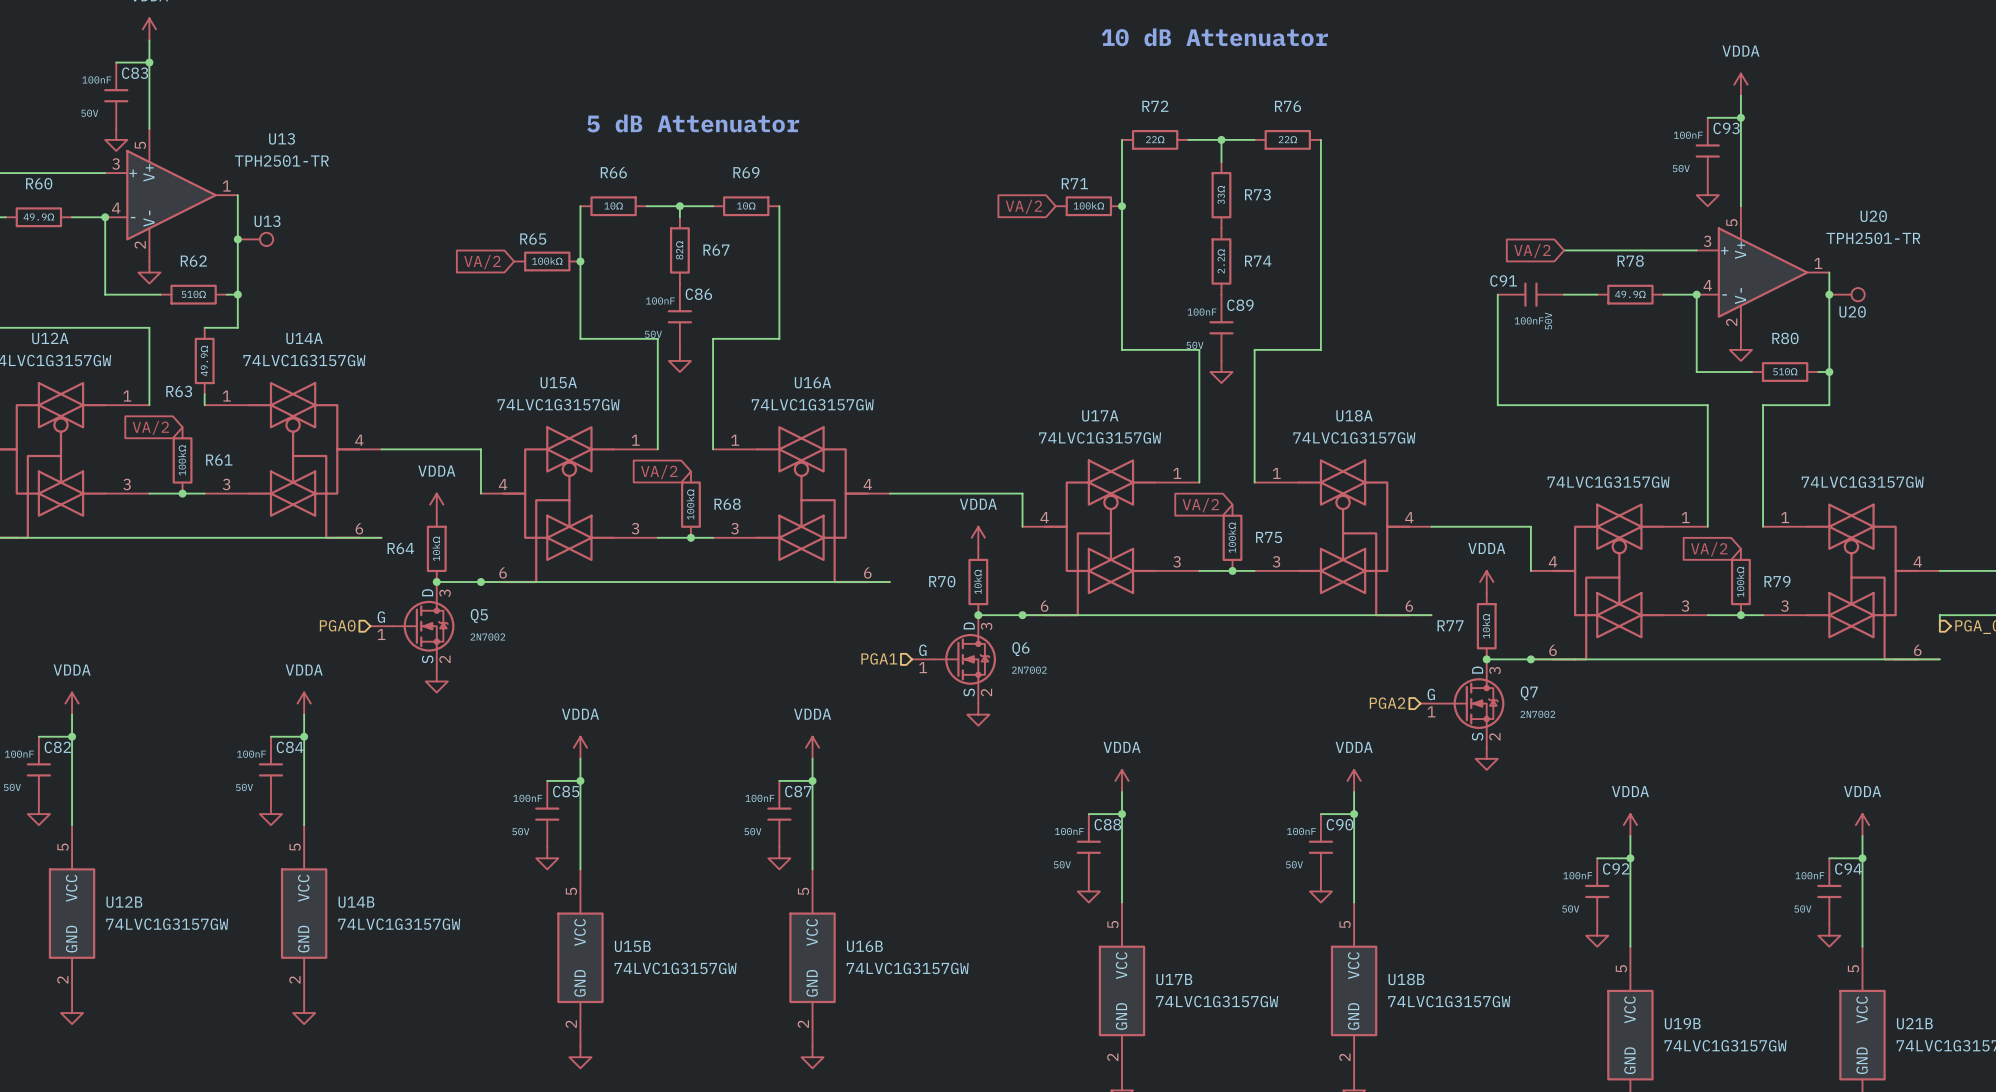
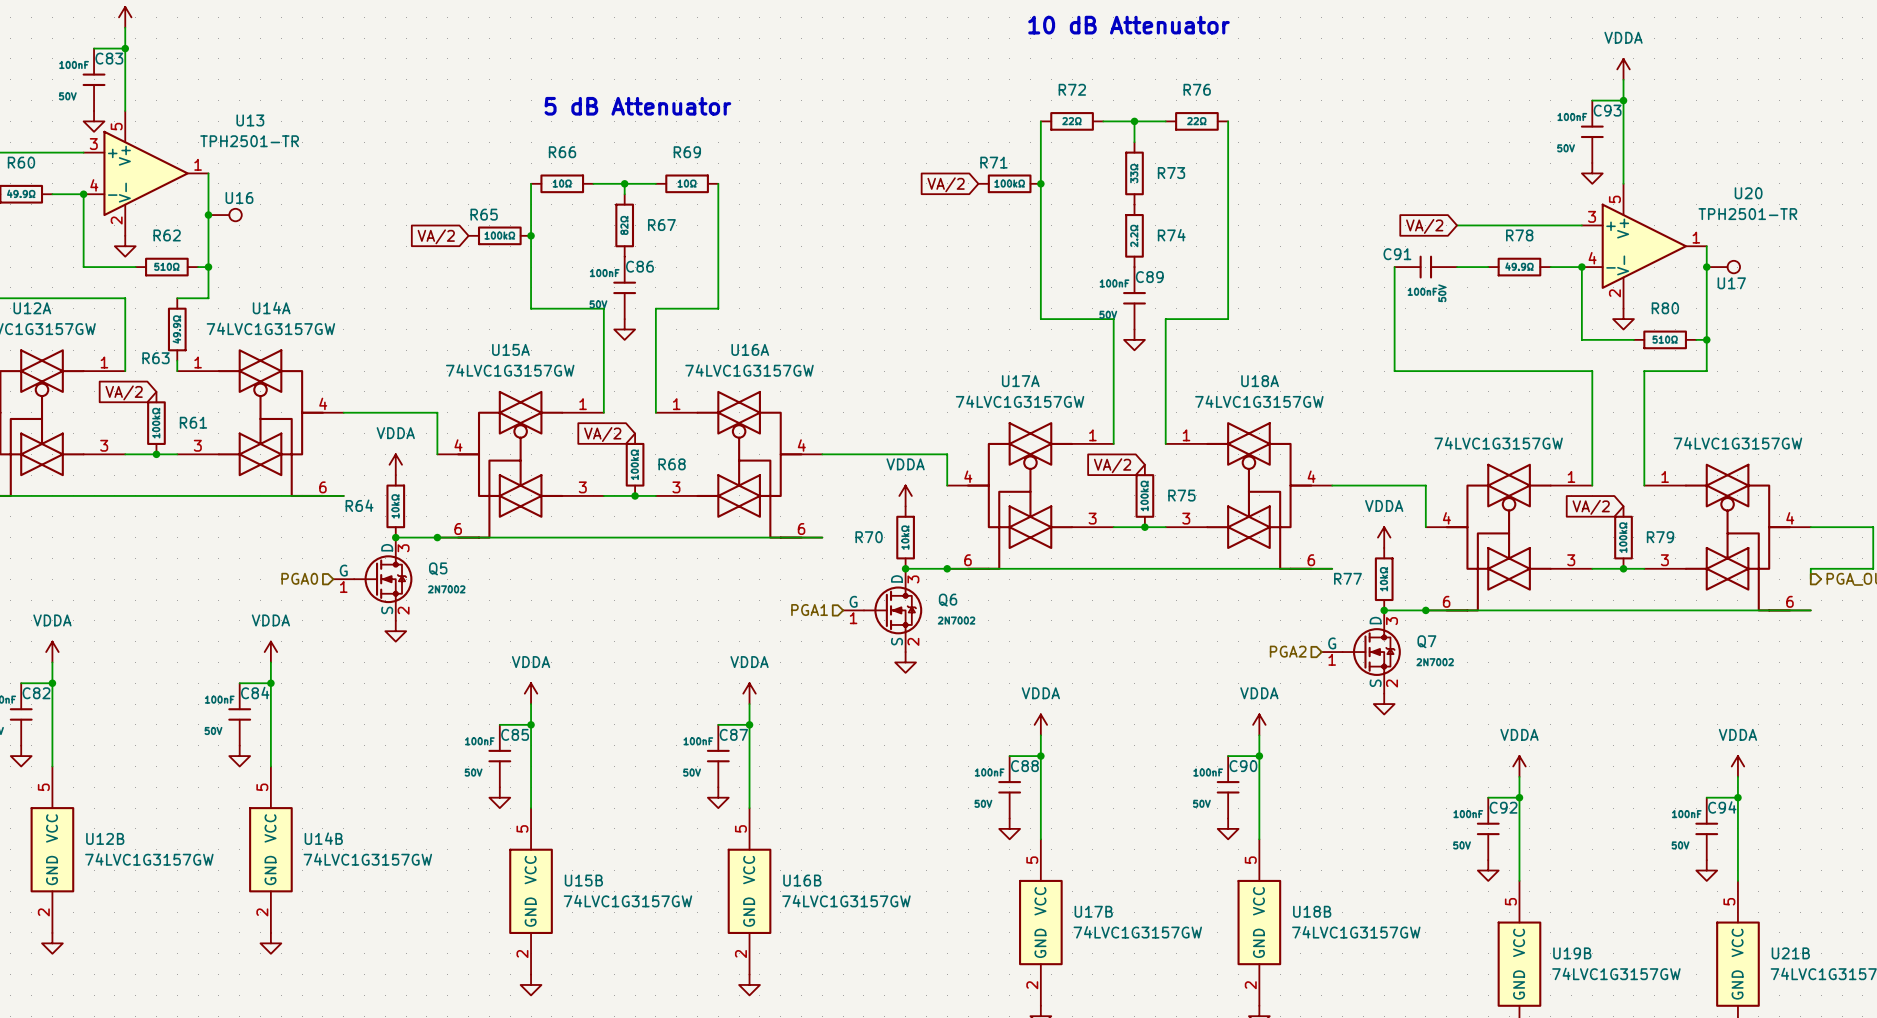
part value: U13 (267, 221) -> U16 (239, 198)
part value: U20 (1852, 311) -> U17 (1731, 283)

